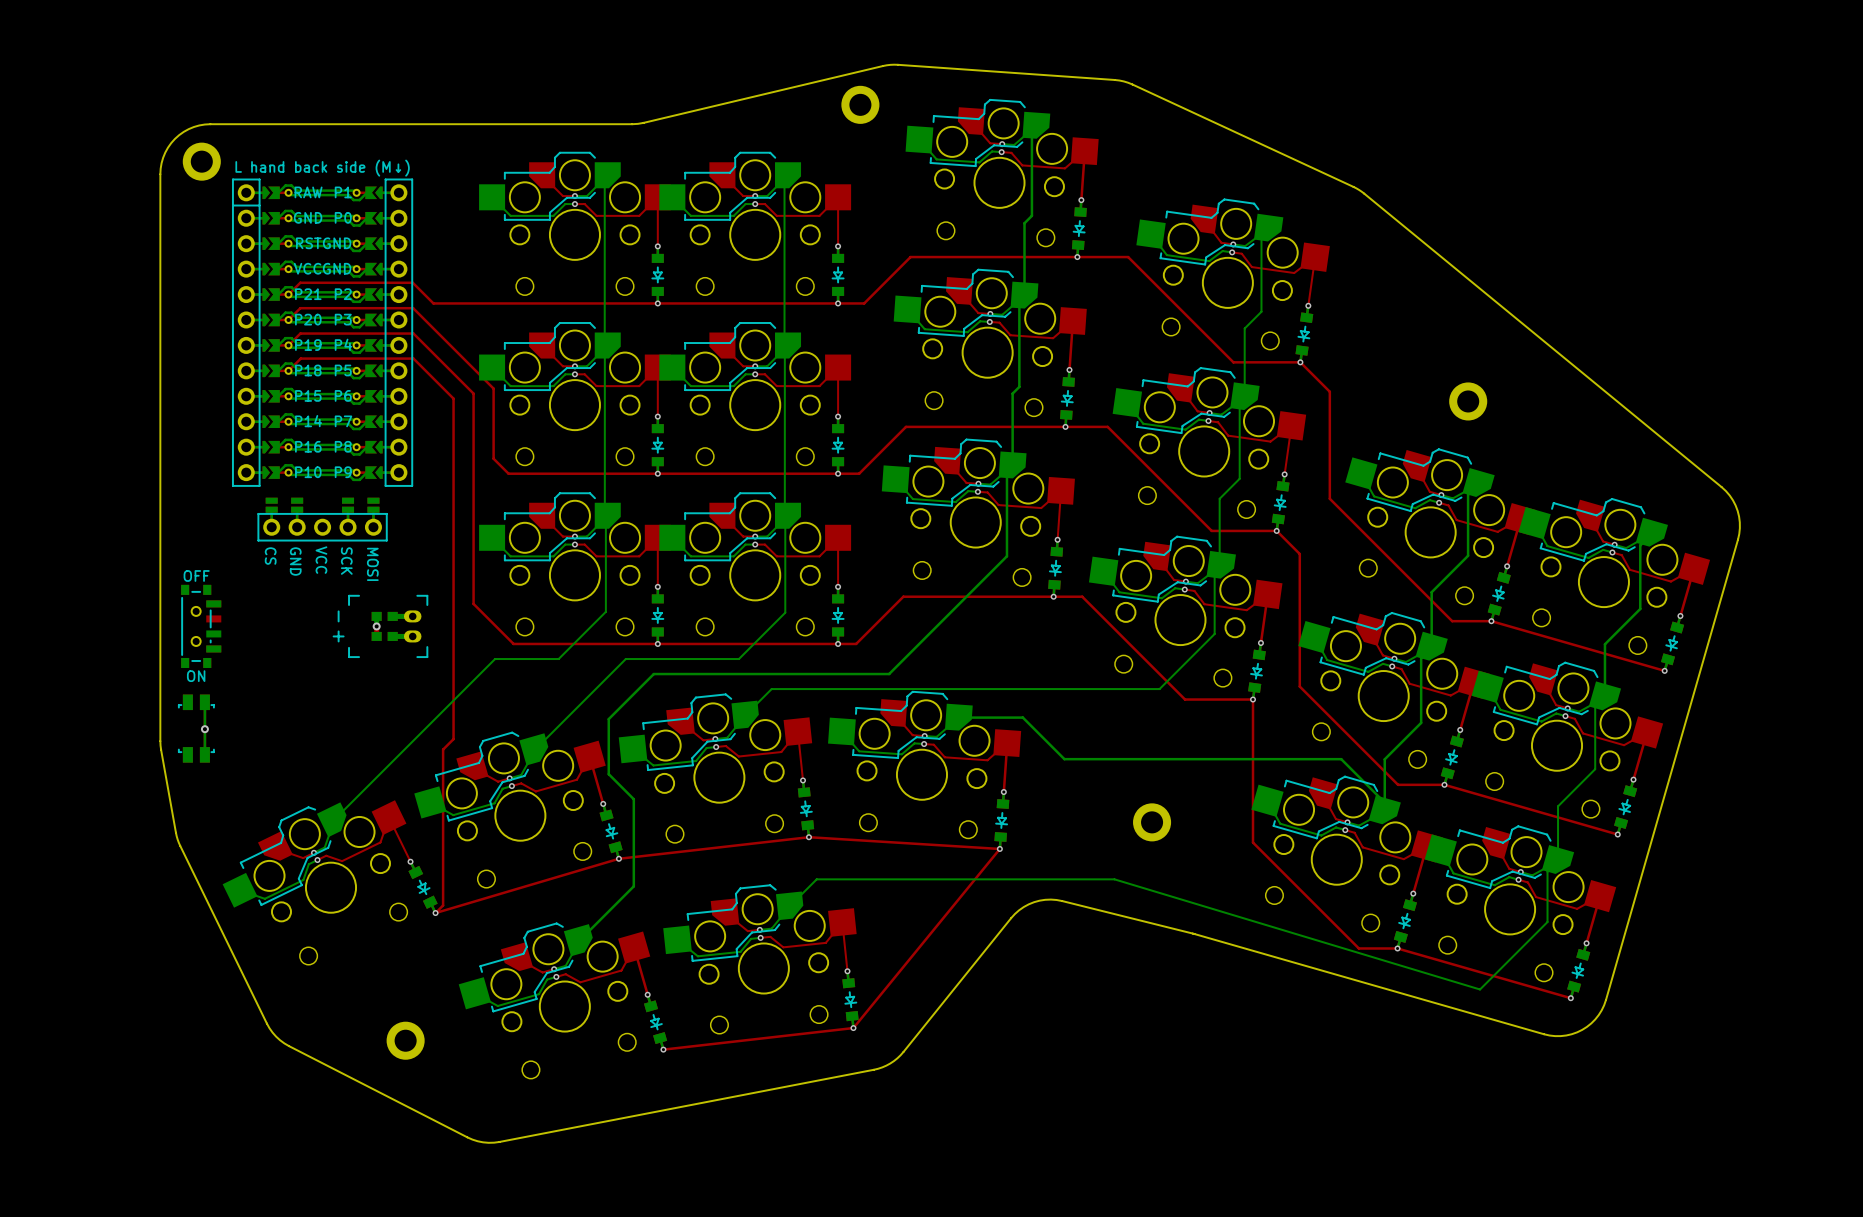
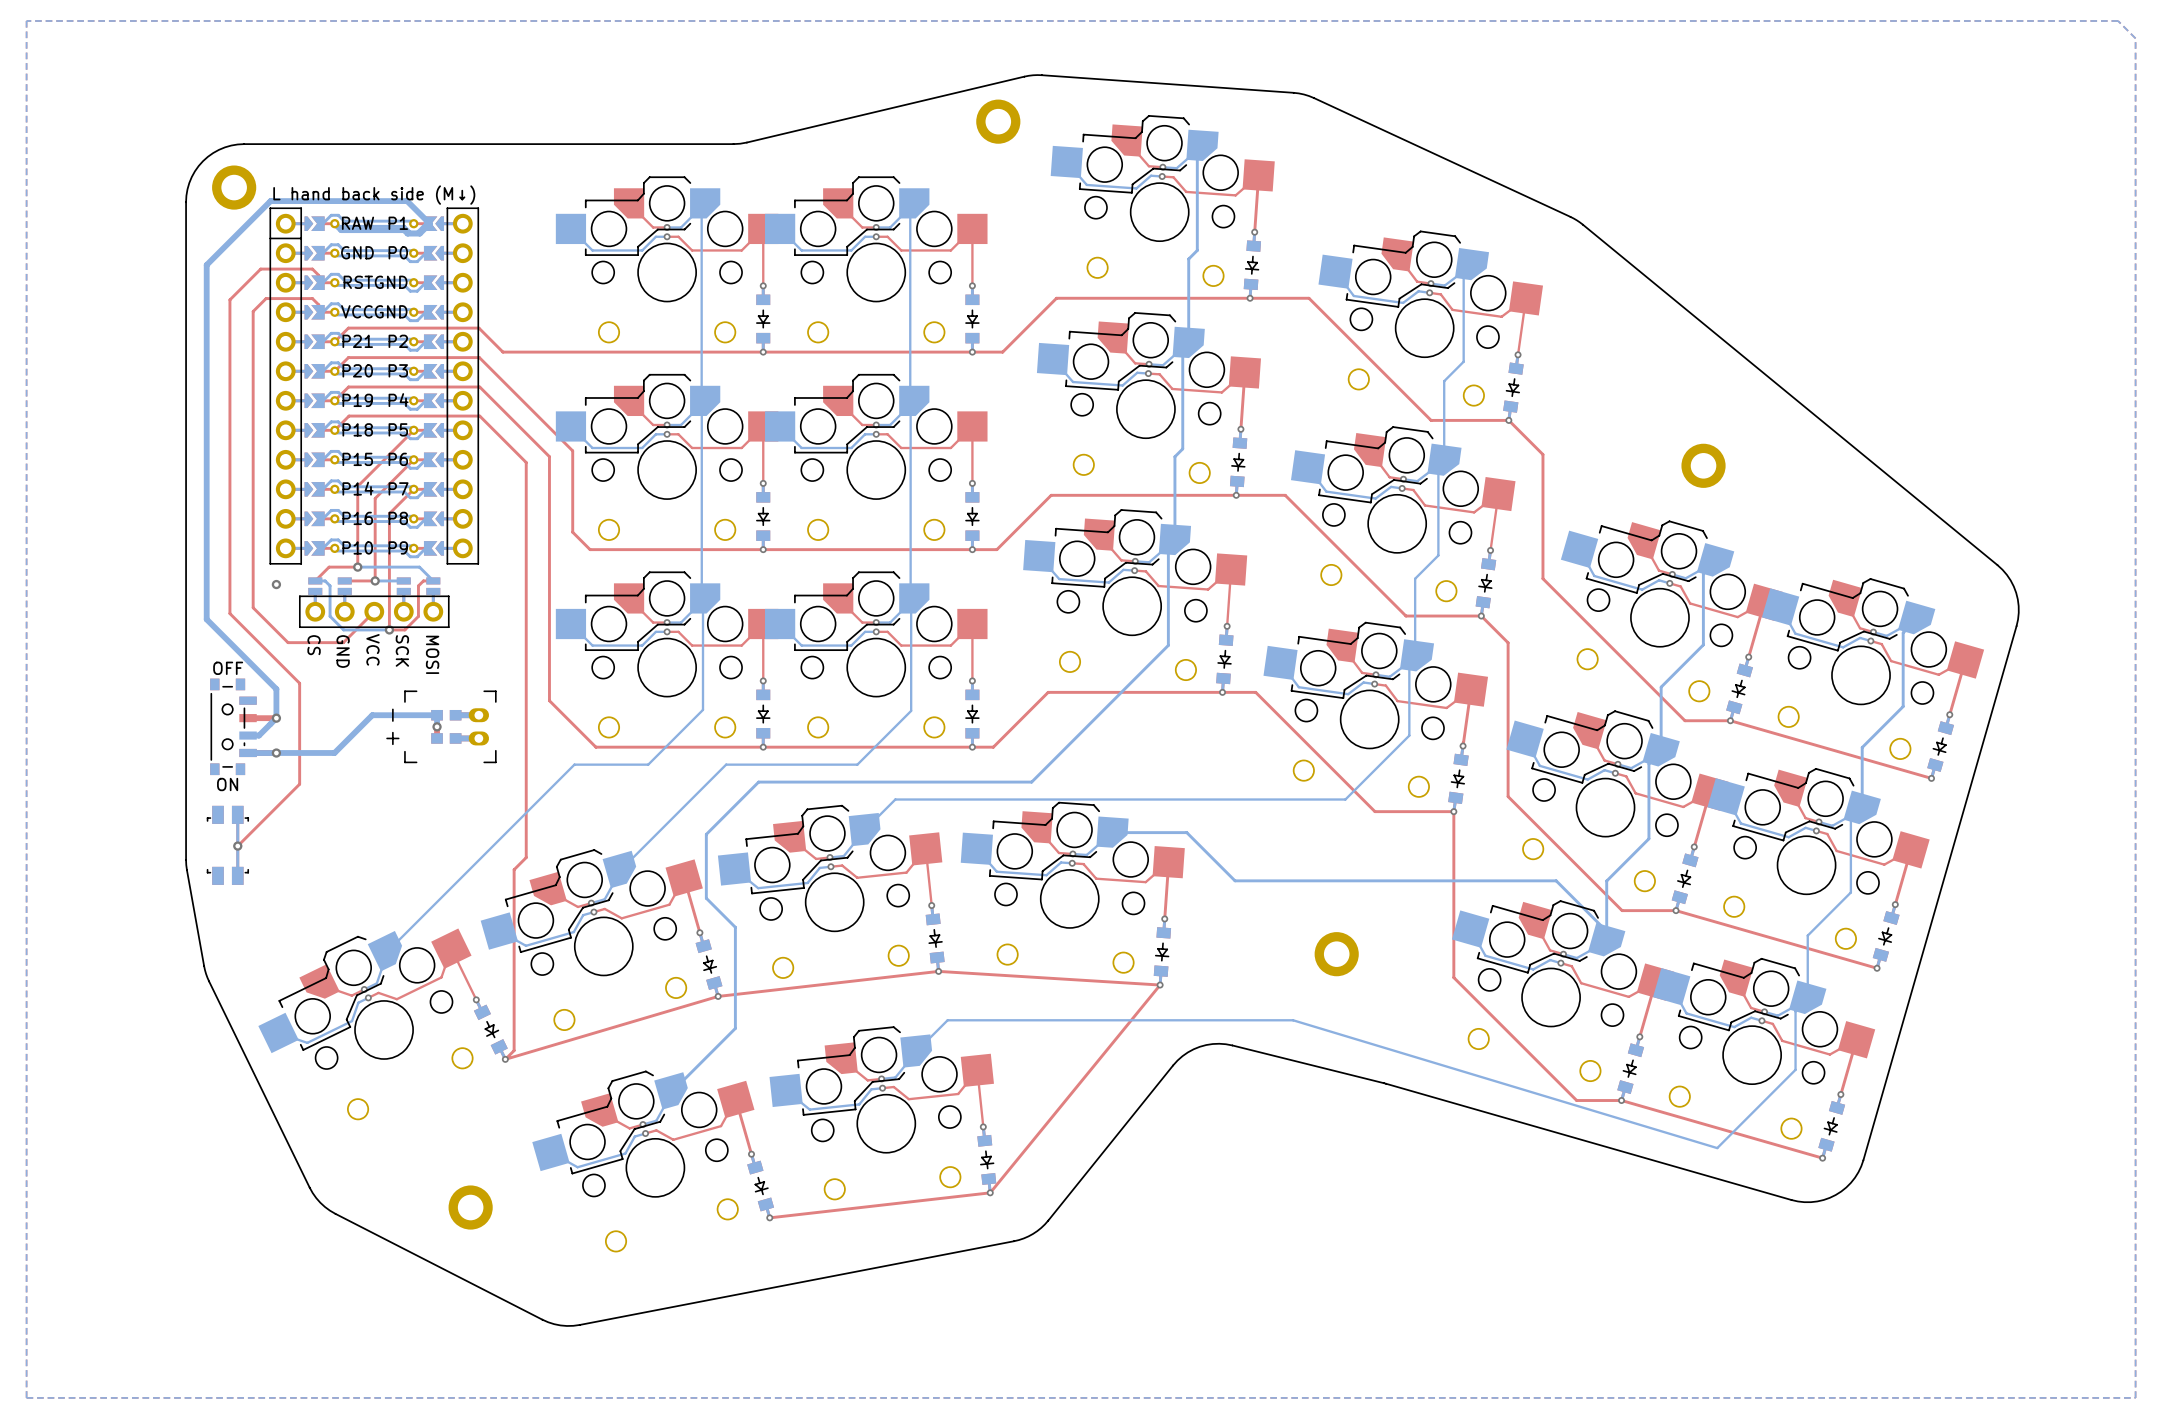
bottom zone outline: none -> (2118, 20) (2135, 38) (2135, 1397) (26, 1397) (26, 20) (2118, 20)
bottom track: none -> (334, 223) (341, 230) (404, 230) (407, 233) (419, 233) (429, 223) (407, 201) (270, 201) (206, 265) (206, 619) (276, 689) (276, 718) (259, 735) (248, 735)
top track: none -> (318, 282) (318, 275) (312, 269) (260, 269) (229, 299) (229, 613) (299, 683) (299, 784) (237, 846)
top track: none -> (318, 312) (318, 304) (312, 298) (266, 298) (253, 311) (253, 607) (288, 642) (343, 642) (374, 611)
top track: none -> (413, 430) (357, 486) (357, 567) (329, 567) (315, 580)
top track: none -> (413, 459) (375, 498) (375, 580) (344, 580)
top track: none -> (413, 489) (389, 513) (389, 629) (404, 629) (418, 616) (418, 585) (423, 580) (433, 580)
bottom track: none -> (357, 567) (419, 567) (433, 580)
via: none -> (357, 567)
bottom track: none -> (315, 580) (325, 580) (330, 585) (330, 616) (343, 629) (389, 629)
via: none -> (375, 580)
bottom track: none -> (403, 580) (375, 580)
via: none -> (276, 584)
via: none -> (389, 629)
bottom track: none -> (437, 715) (372, 715) (334, 752) (248, 753)
top track: none -> (276, 718) (248, 718)
via: none -> (276, 718)
via: none -> (276, 753)

